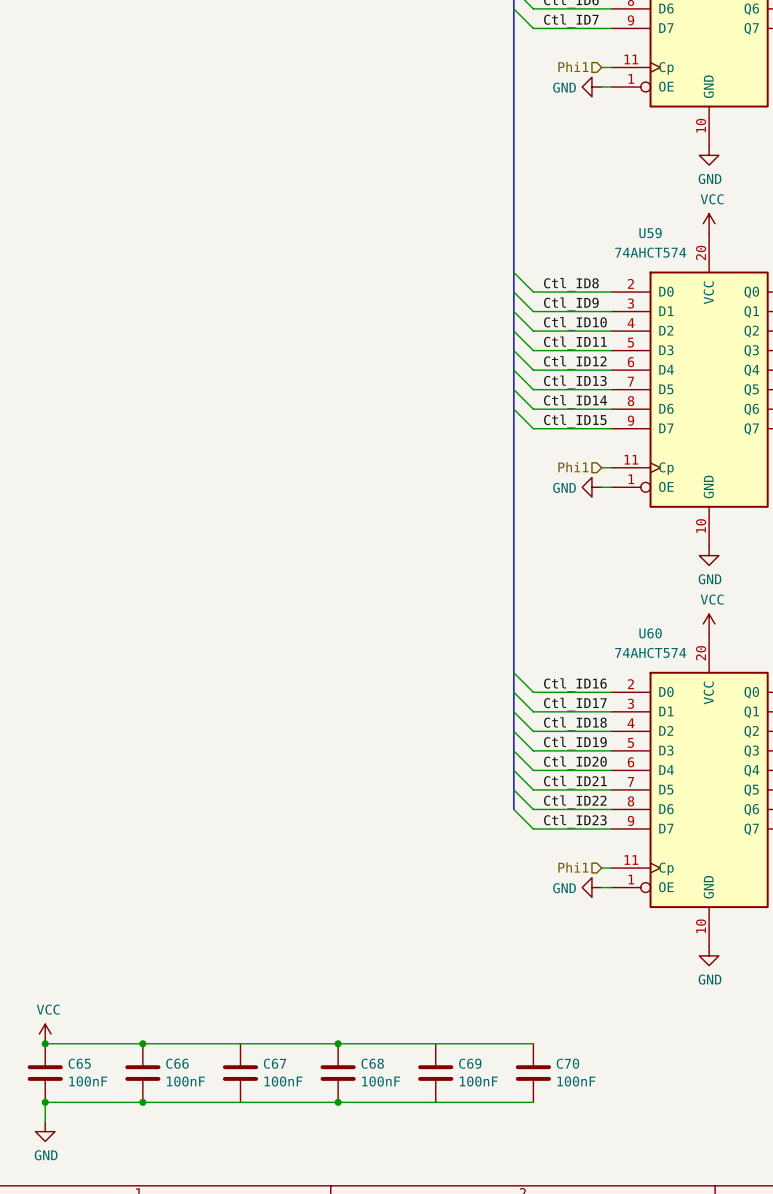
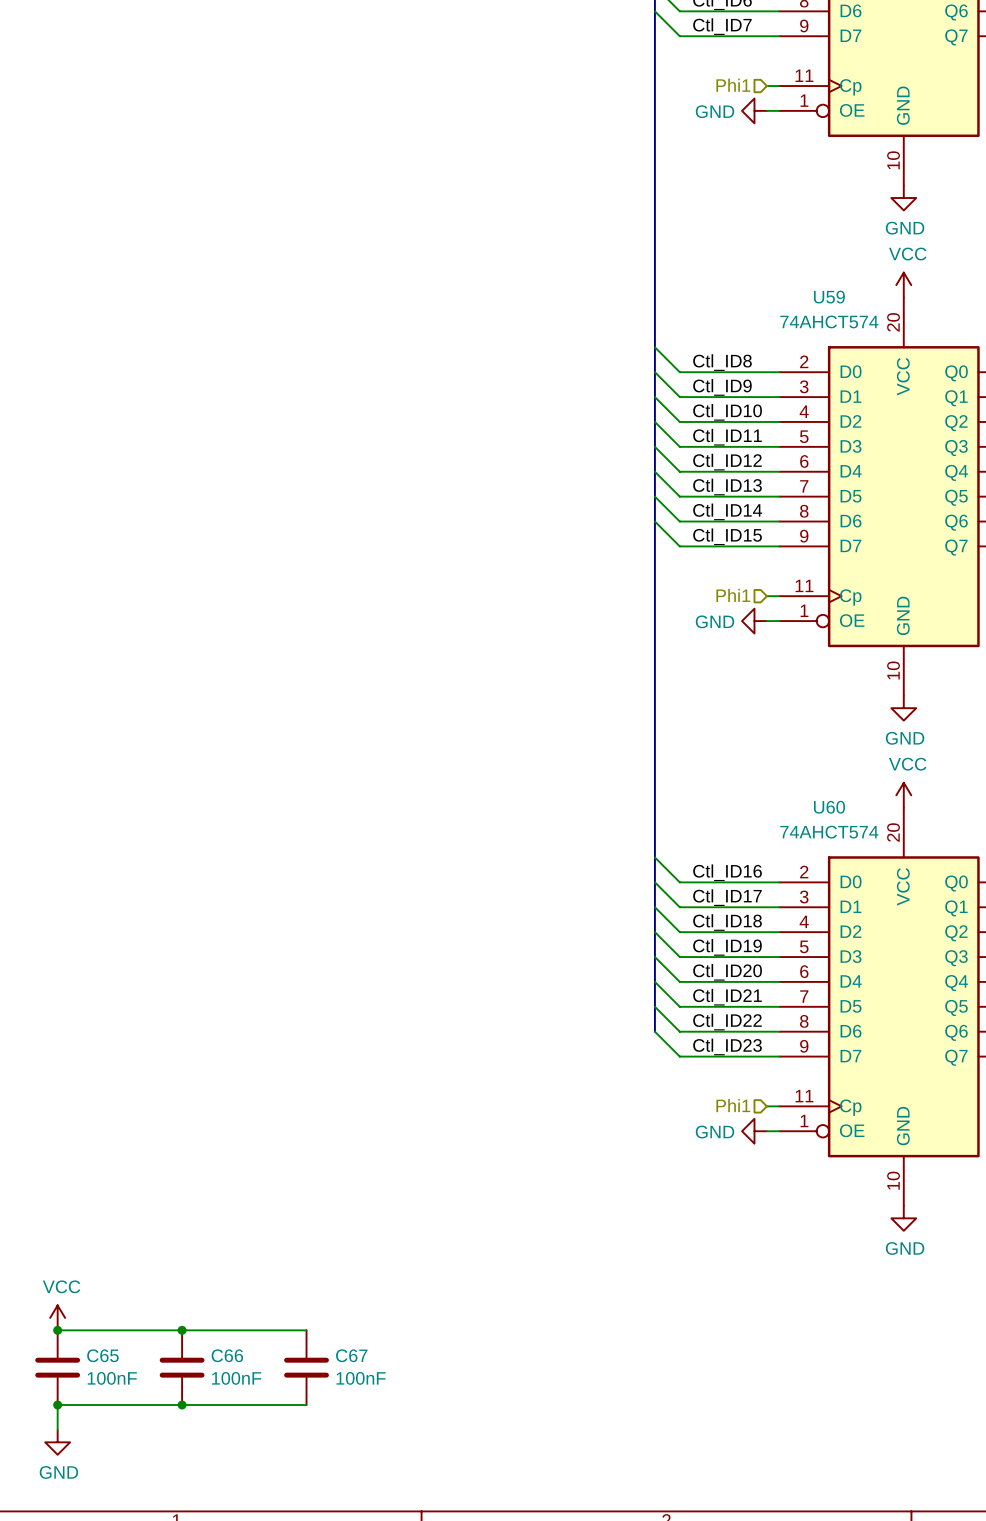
wire: (240, 1043) (533, 1043) -> none
junction: (338, 1043) -> none
C68: 100nF (338, 1073) -> none
C69: 100nF (435, 1073) -> none
C70: 100nF (533, 1073) -> none
wire: (240, 1102) (533, 1102) -> none
junction: (338, 1102) -> none

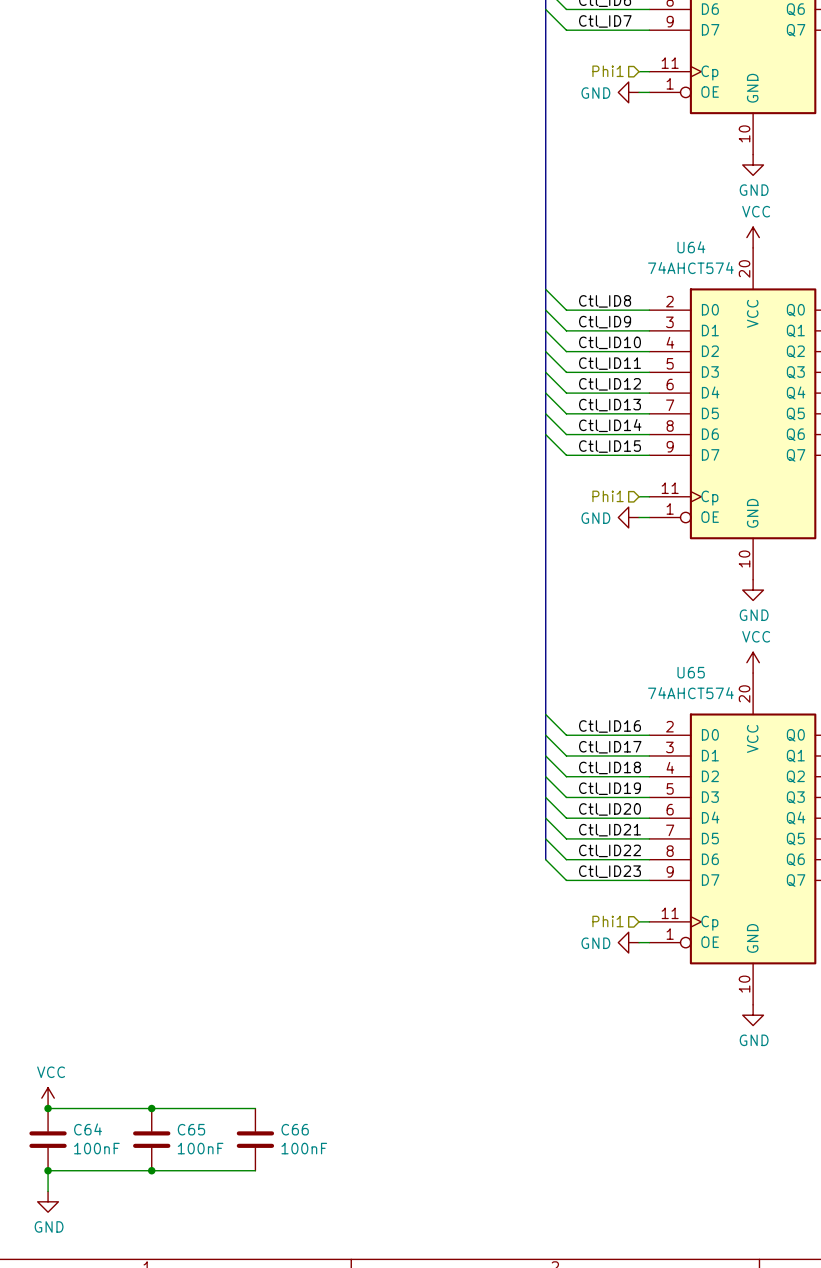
U59 name: U59 (829, 297) -> U64 (691, 247)
U60 name: U60 (829, 807) -> U65 (691, 672)
C65 name: C65 (102, 1355) -> C64 (88, 1129)
C66 name: C66 (227, 1355) -> C65 (191, 1129)
C67 name: C67 (351, 1355) -> C66 (295, 1129)

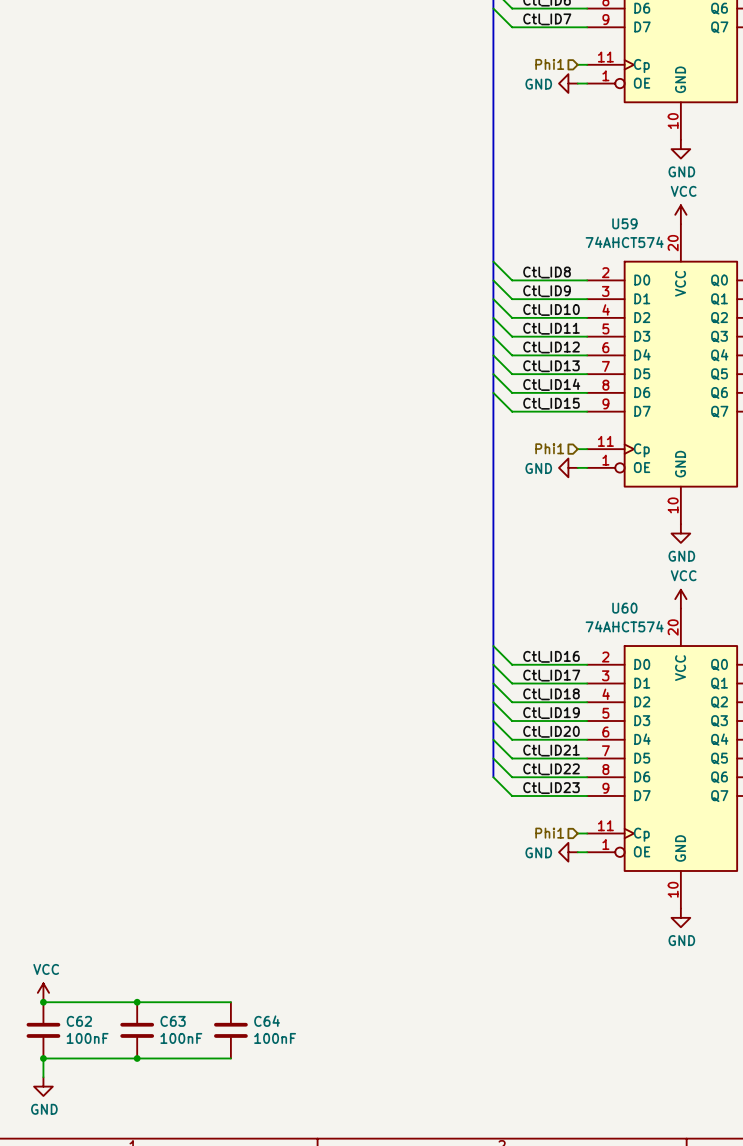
U64 name: U64 (691, 247) -> U59 (624, 223)
U65 name: U65 (691, 672) -> U60 (624, 608)
C64 name: C64 (88, 1129) -> C62 (79, 1021)
C65 name: C65 (191, 1129) -> C63 (173, 1021)
C66 name: C66 (295, 1129) -> C64 (267, 1021)

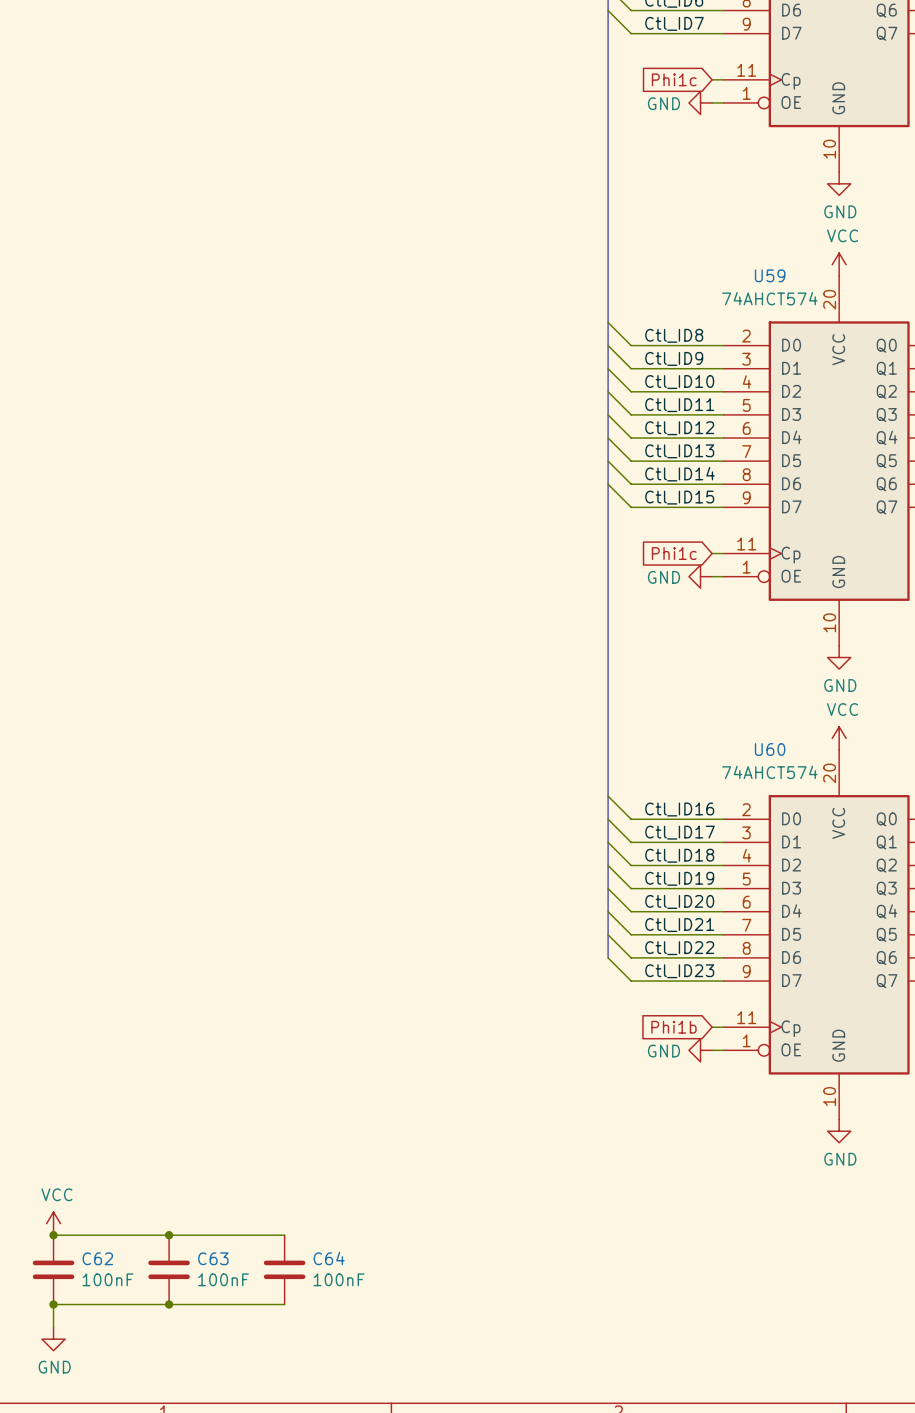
global label: none -> Phi1c (674, 79)
hierarchical label: Phi1 (549, 64) -> none
hierarchical label: Phi1 (549, 448) -> none
global label: none -> Phi1c (674, 553)
global label: none -> Phi1b (673, 1027)
hierarchical label: Phi1 (549, 833) -> none

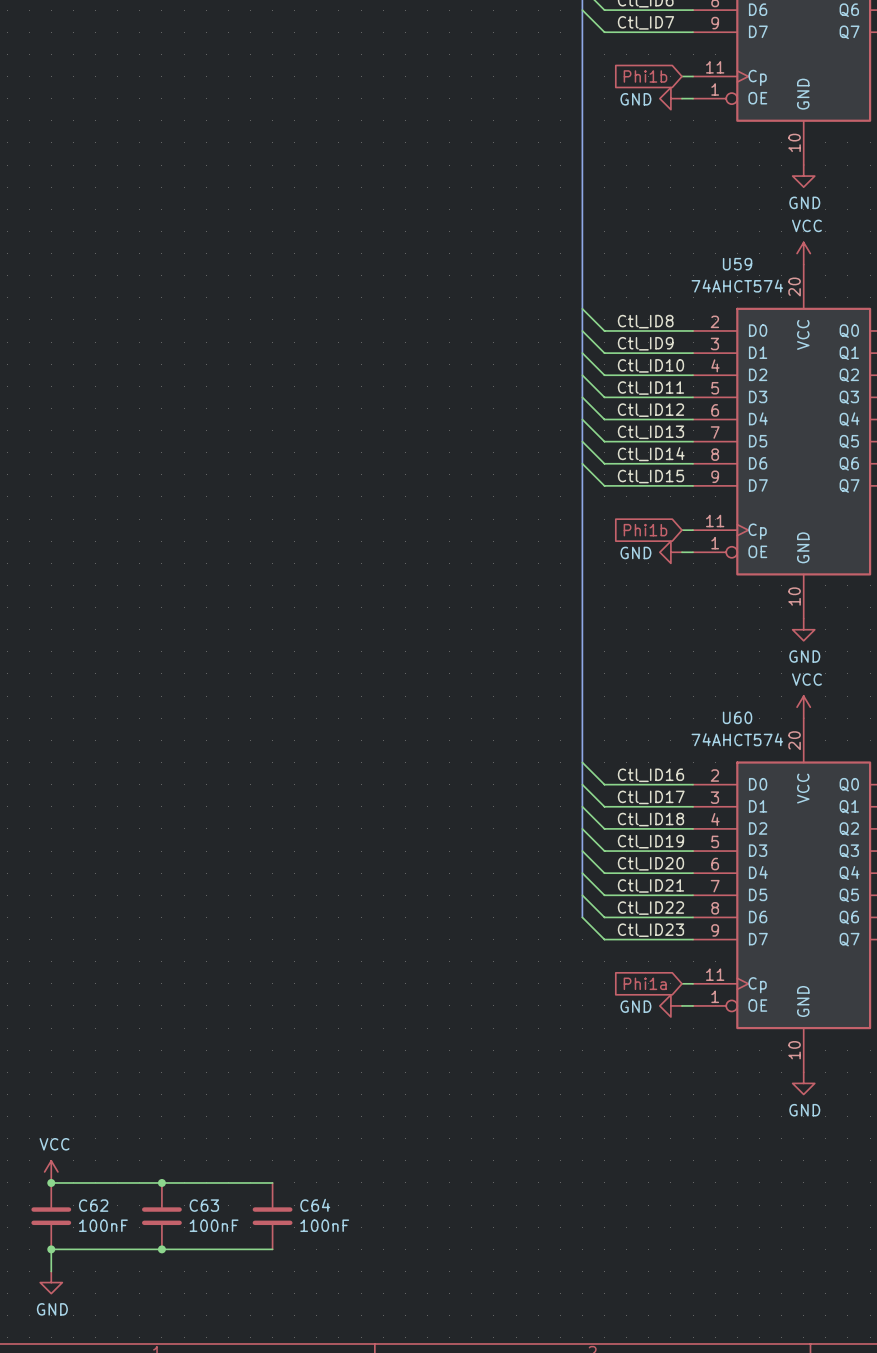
global label: Phi1c (674, 79) -> Phi1b (645, 76)
global label: Phi1c (674, 553) -> Phi1b (645, 530)
global label: Phi1b (673, 1027) -> Phi1a (645, 983)

